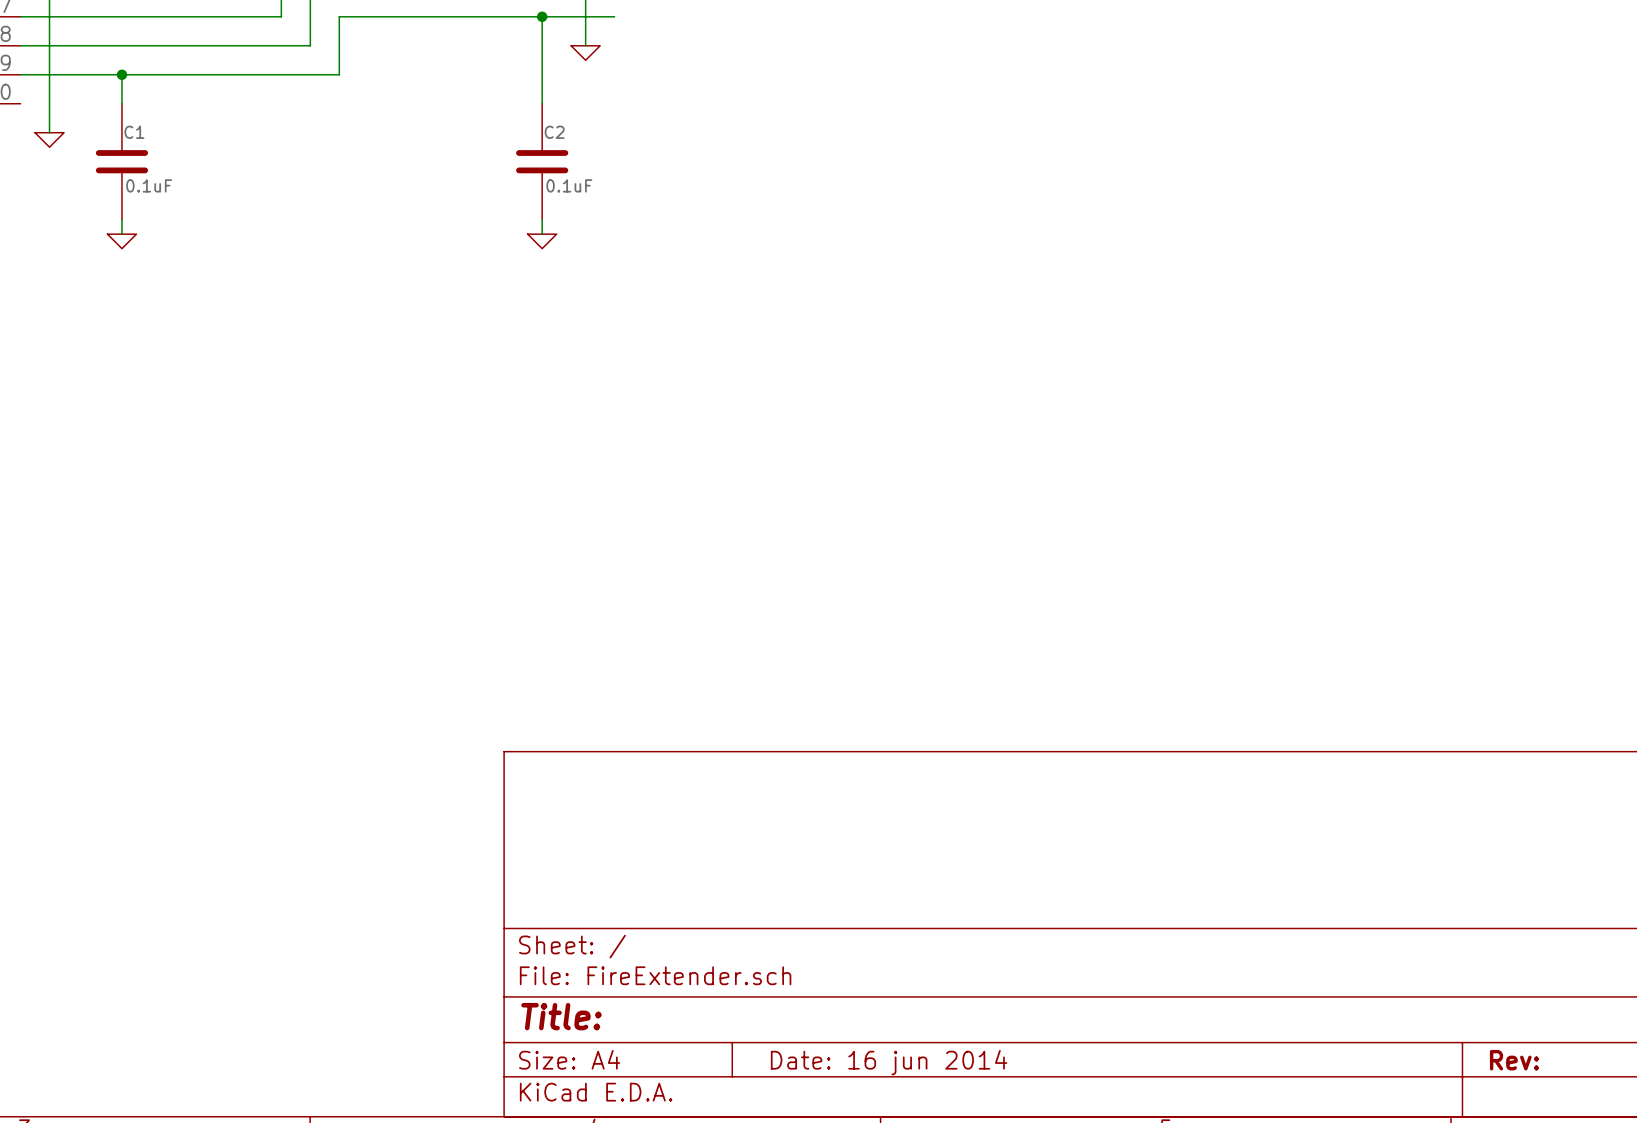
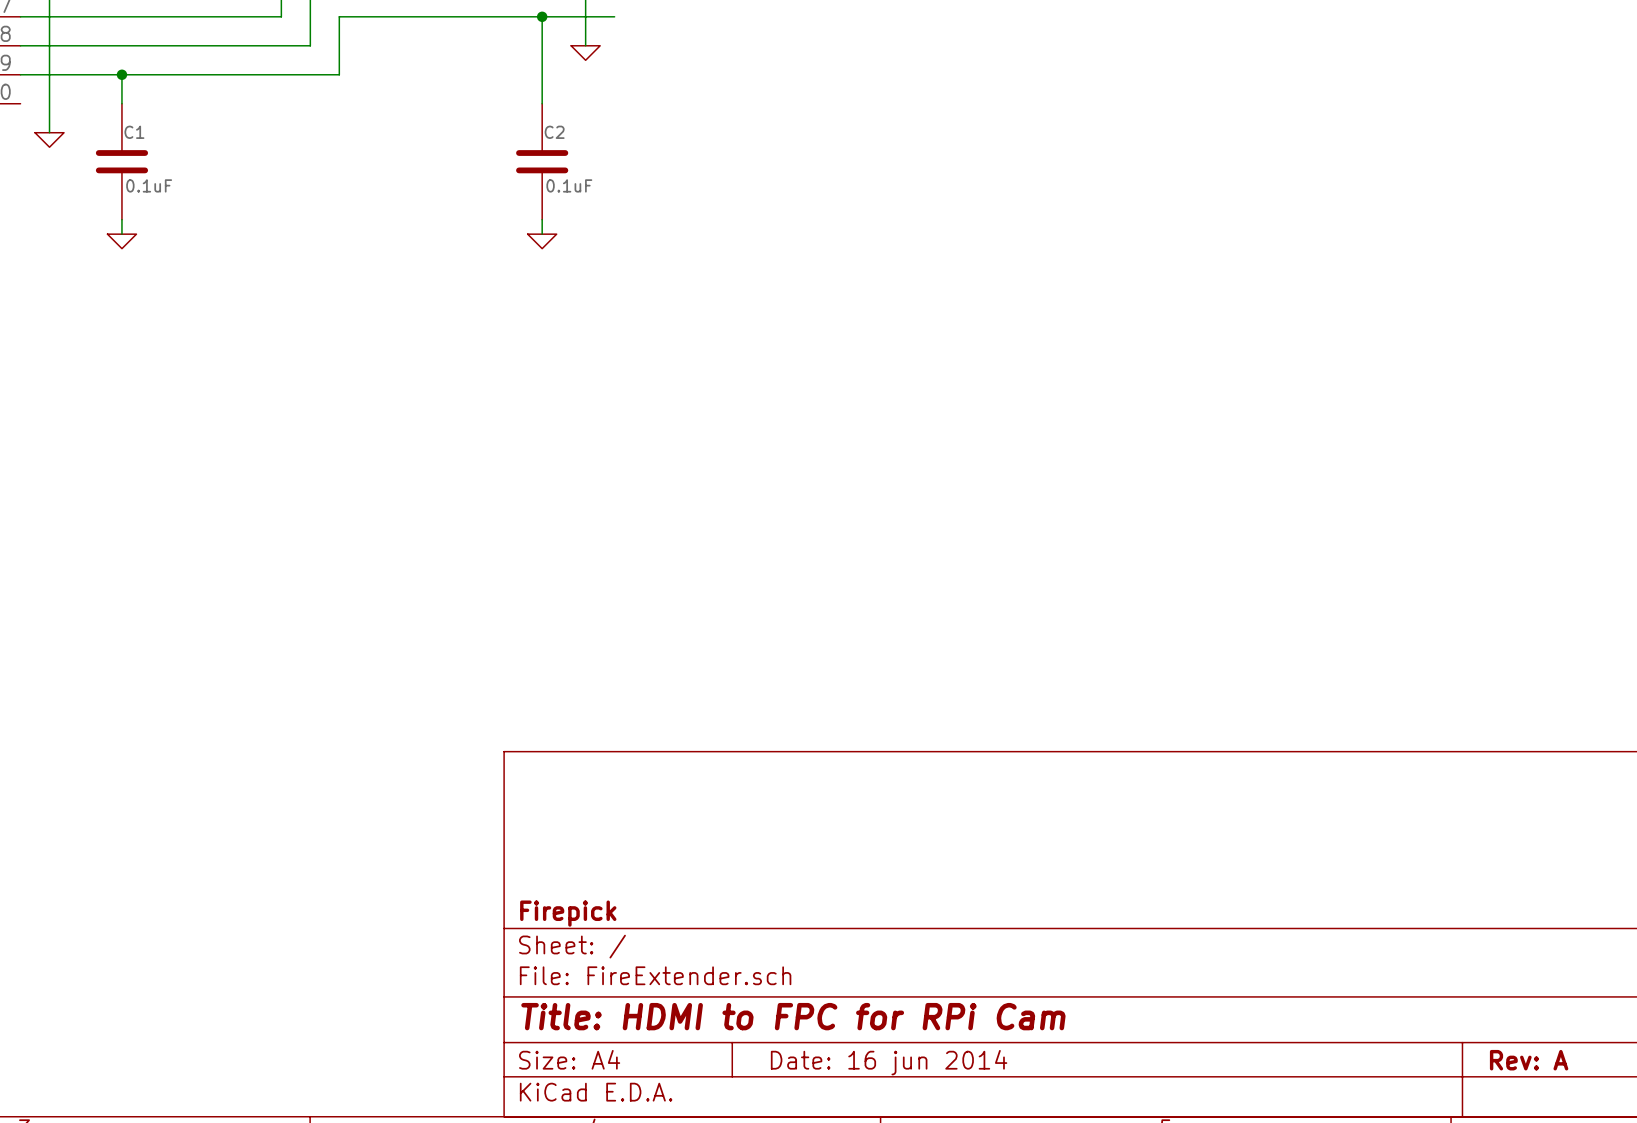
title block: none -> Firepick (568, 913)
title block: Title: (561, 1016) -> Title: HDMI to FPC for RPi Cam (793, 1016)
title block: Rev: (1514, 1060) -> Rev: A (1529, 1060)

